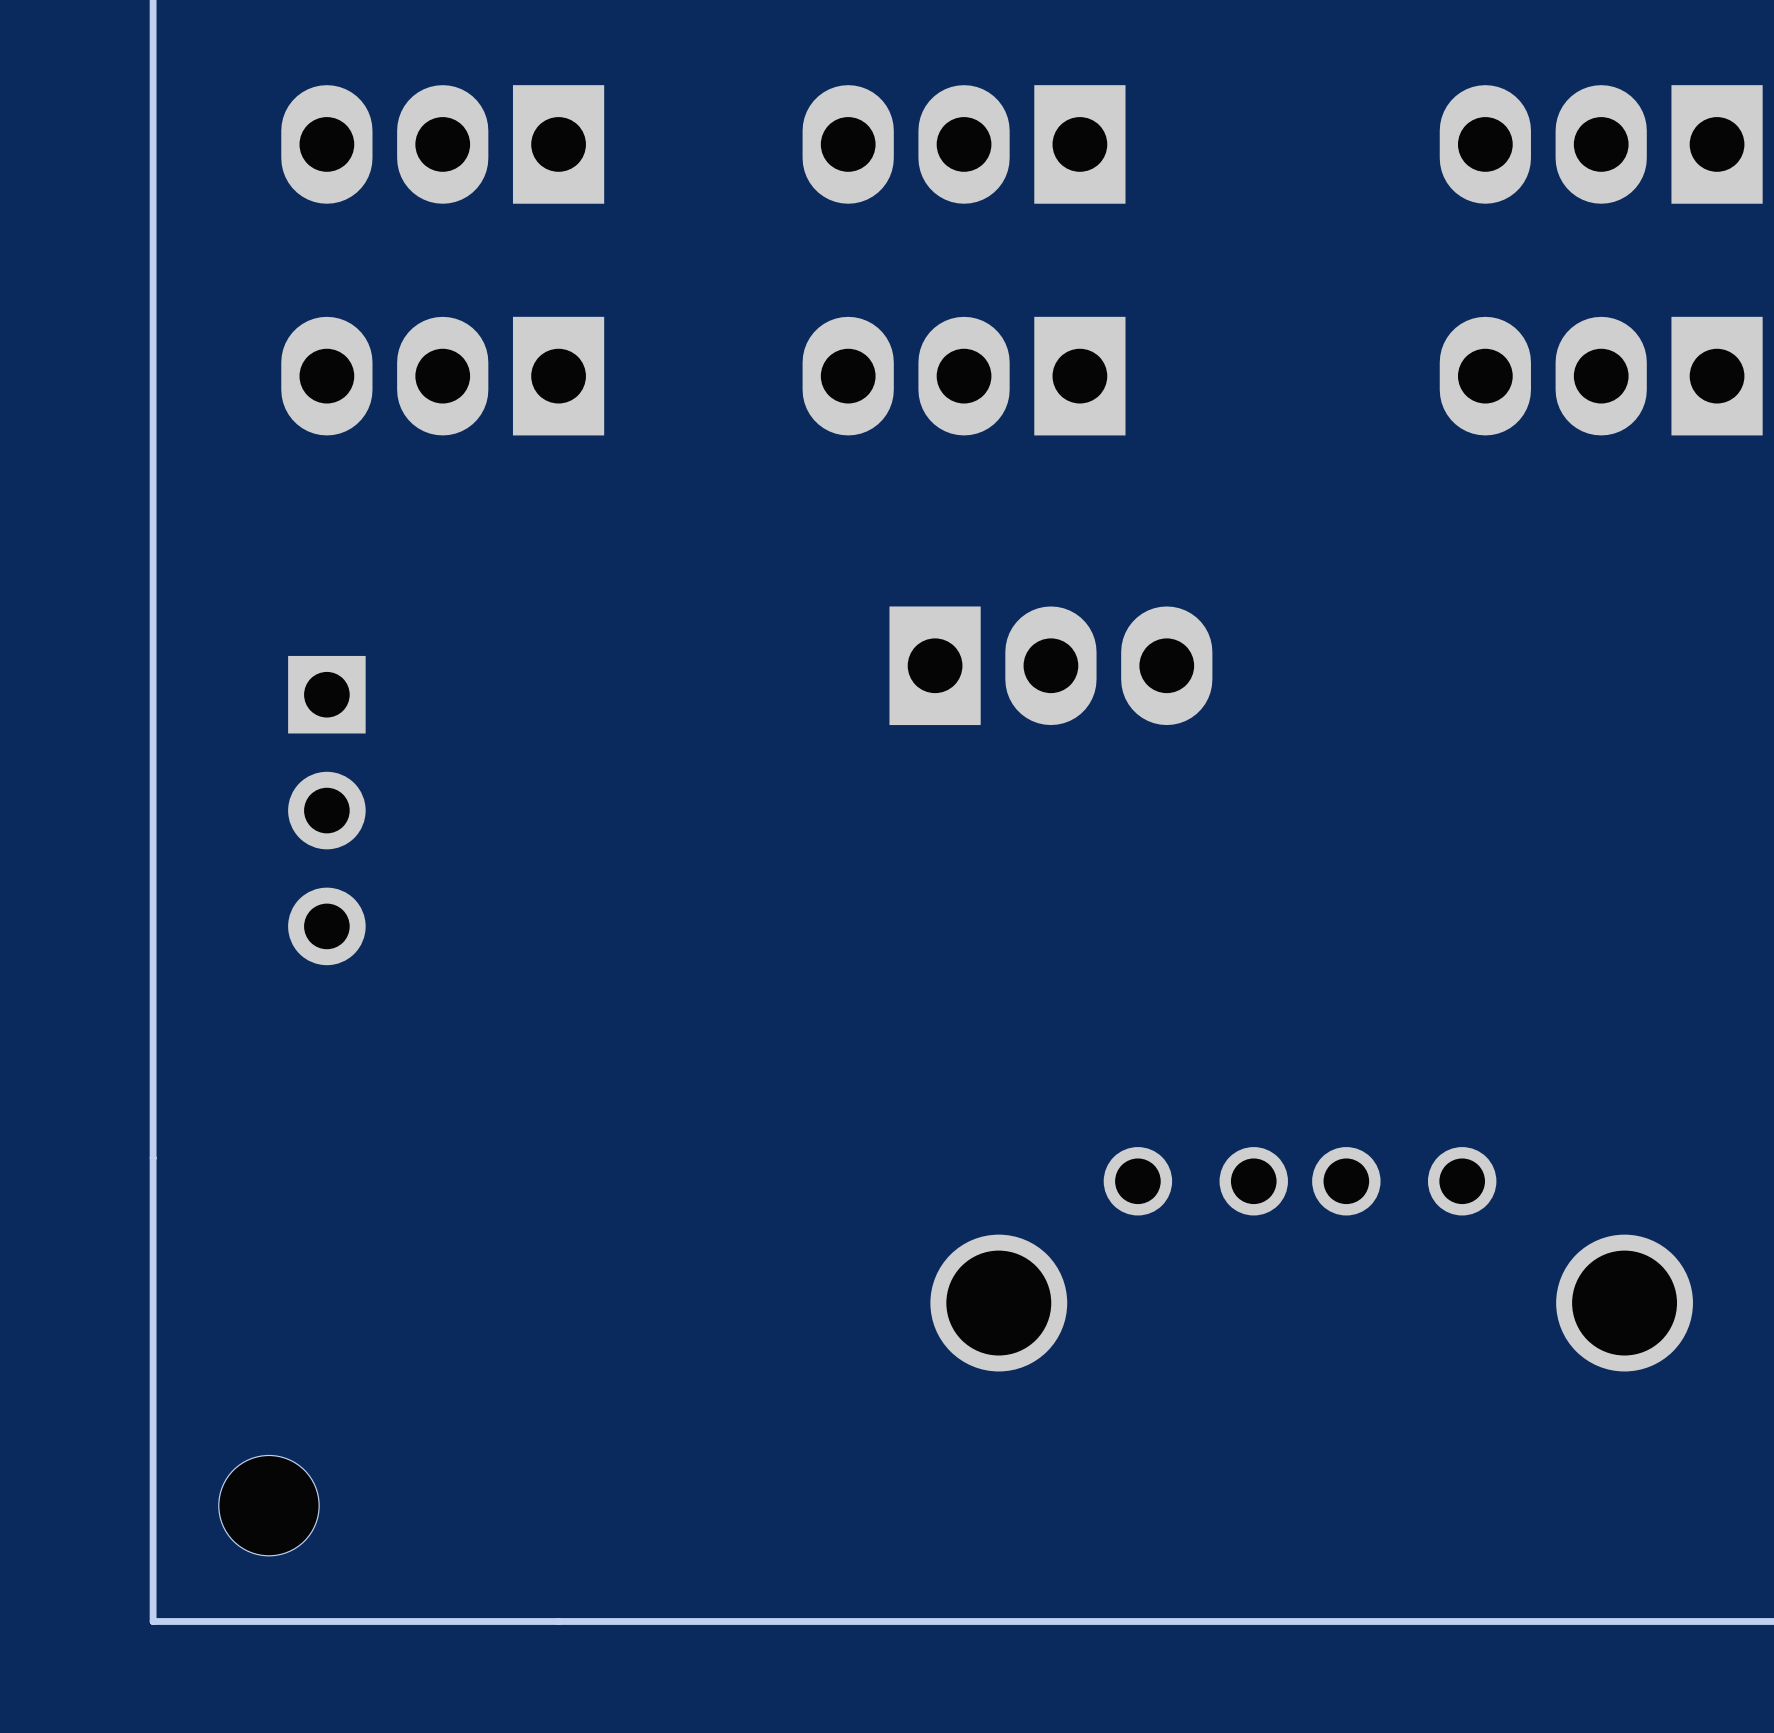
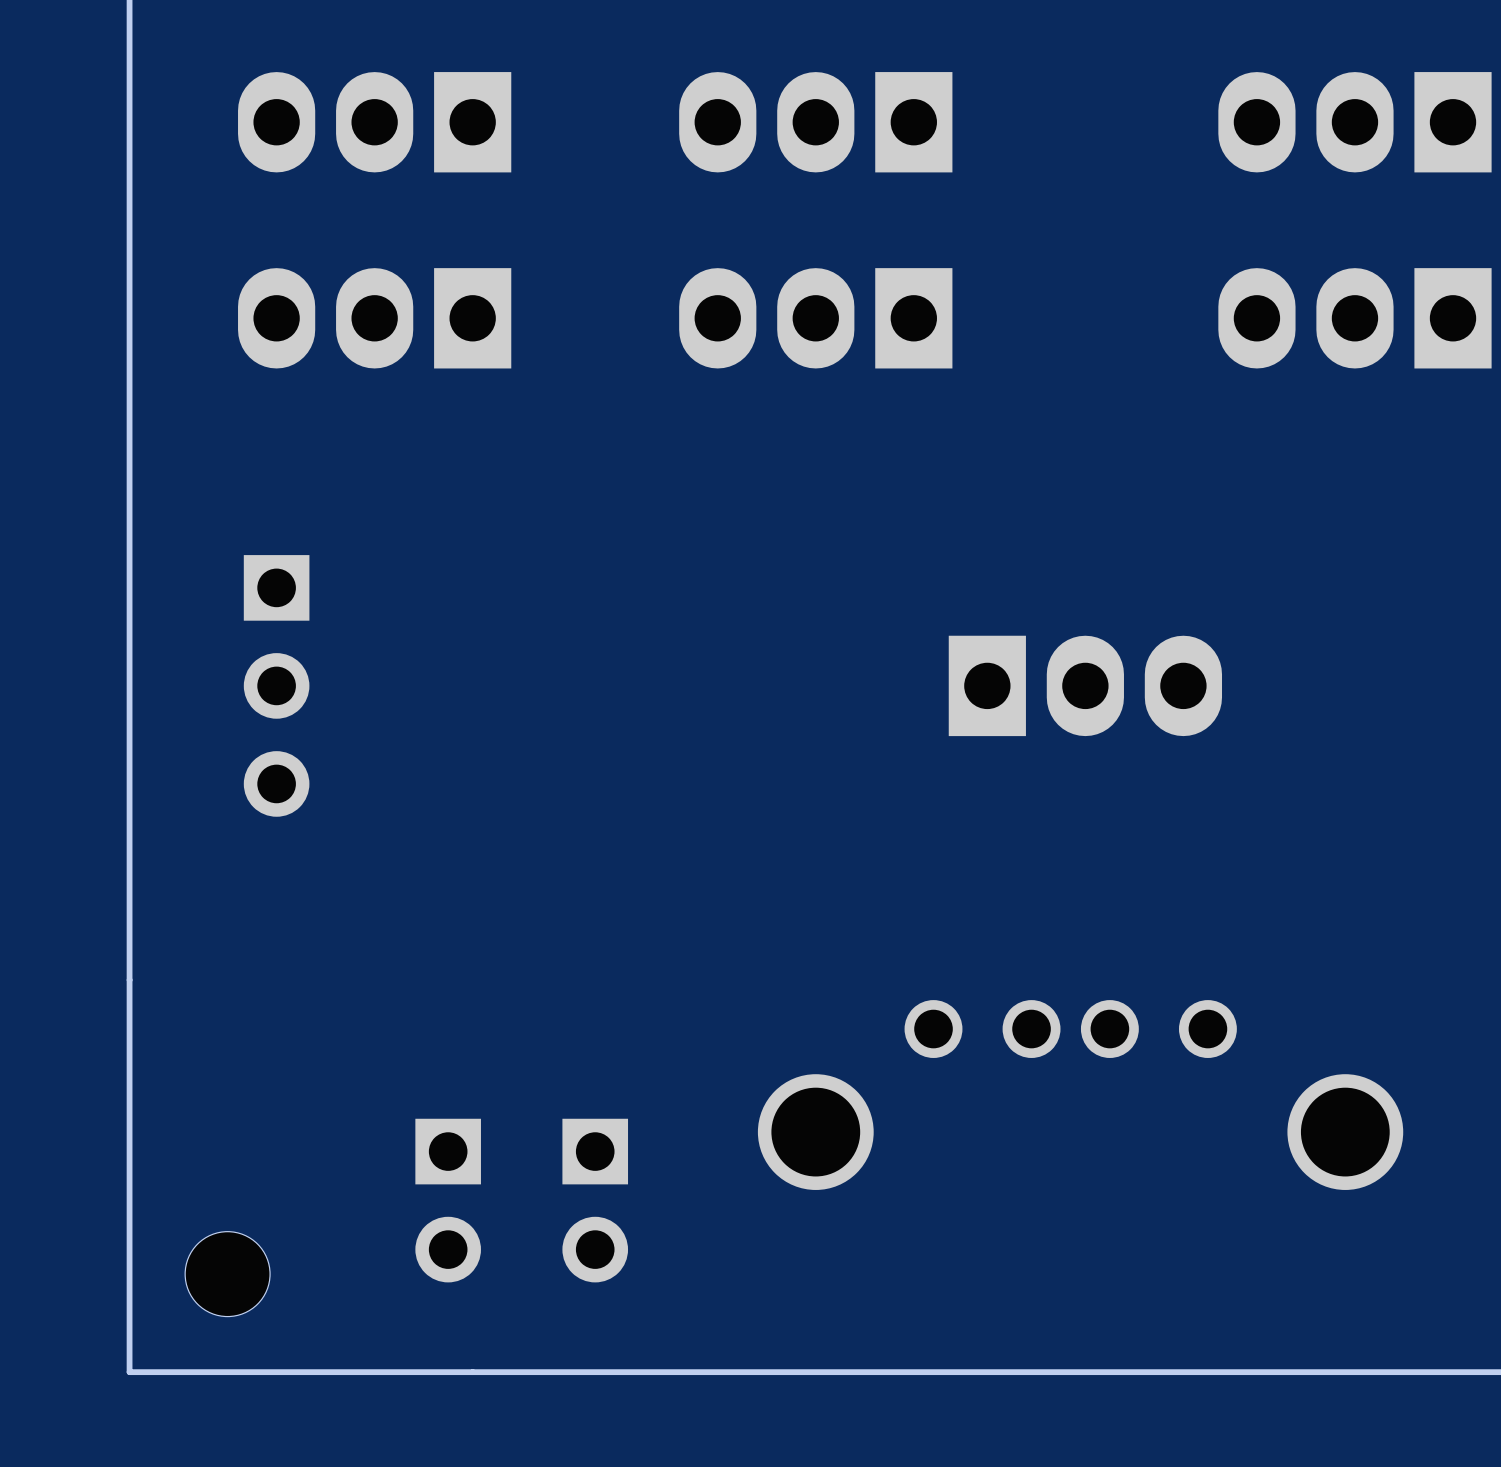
part position: (1050, 665) -> (1085, 685)
part position: (1311, 1259) -> (1080, 1095)
part: none -> (448, 1200)
part: none -> (595, 1200)

